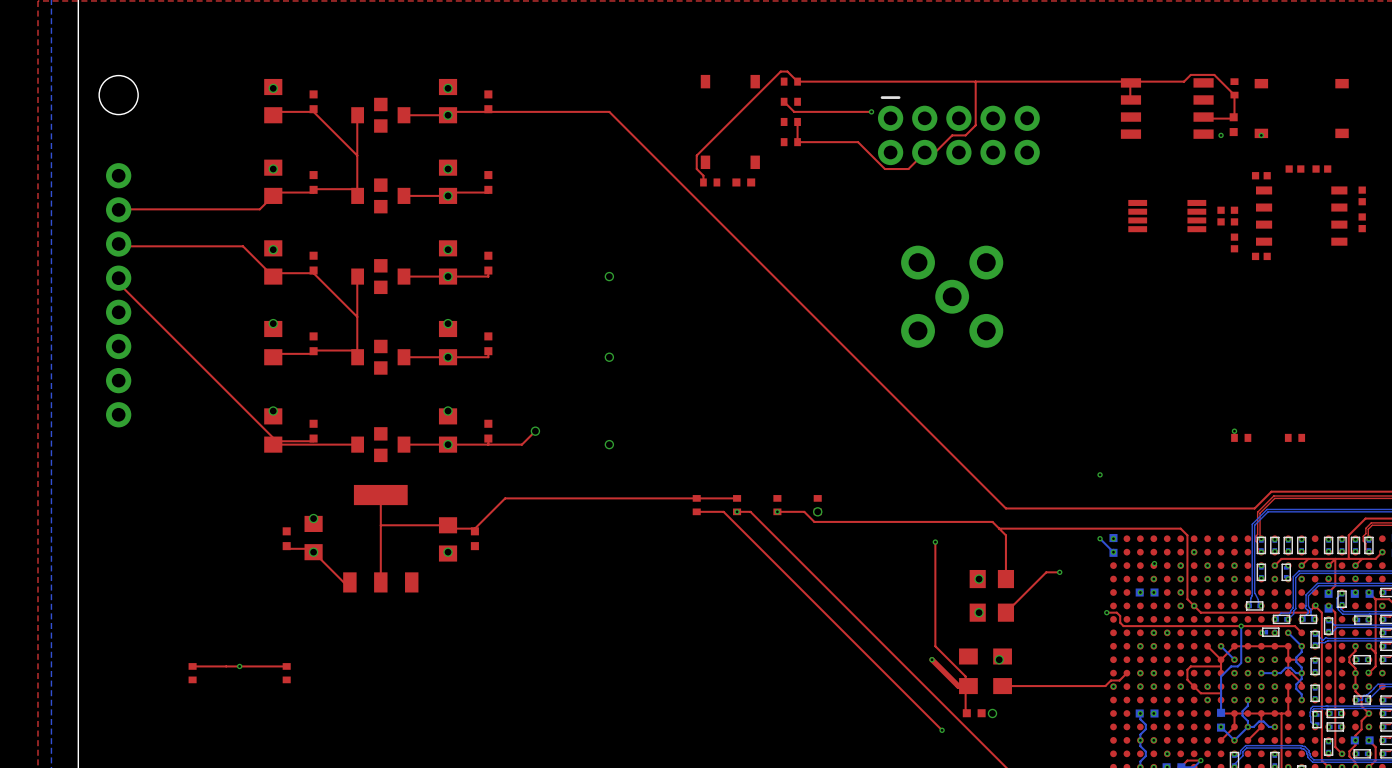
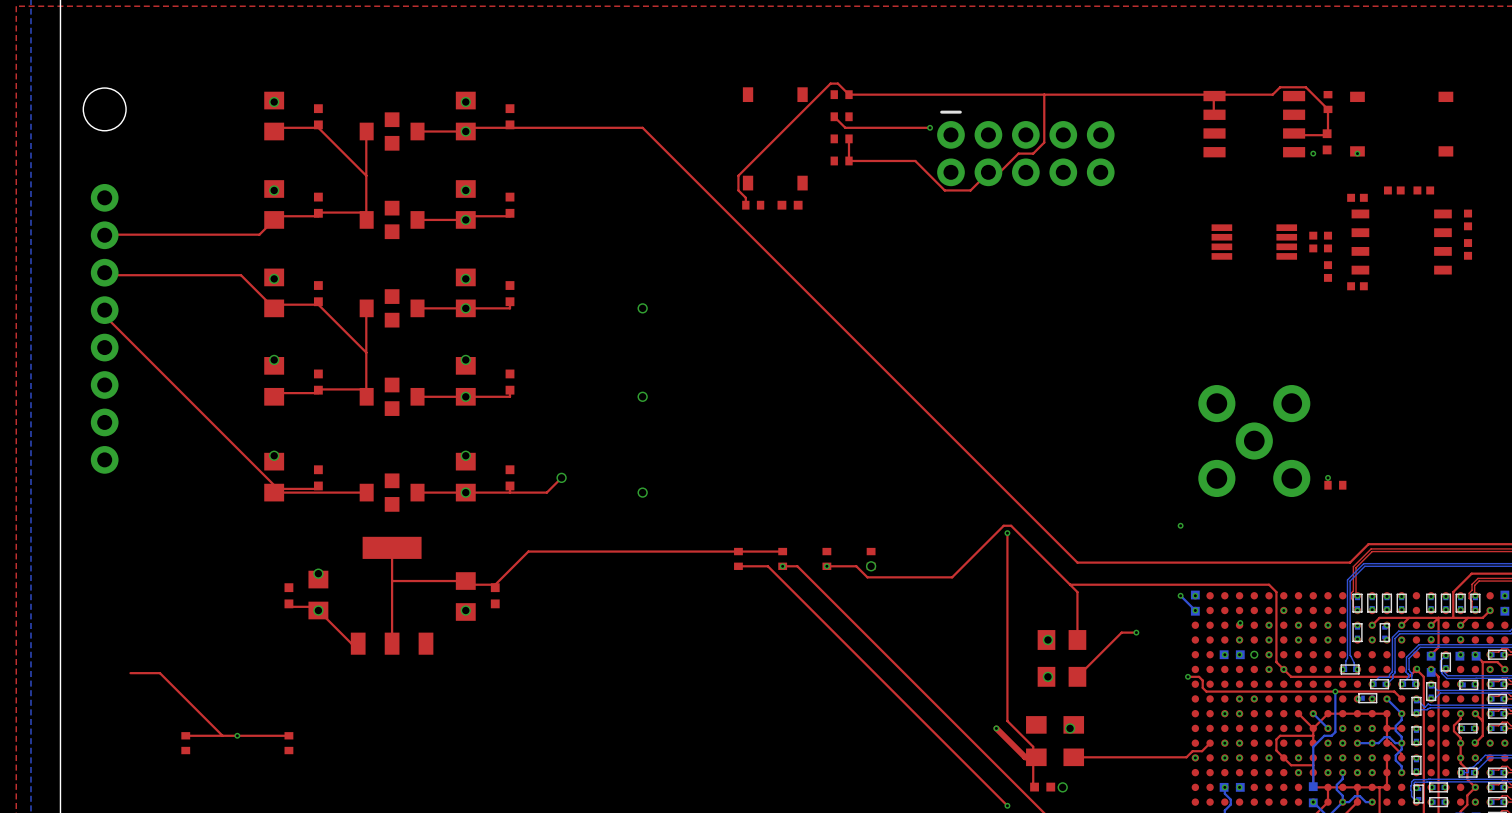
part position: (952, 296) -> (1254, 441)
part: (1294, 437) -> none
top track: (992, 521) (891, 521) -> (1062, 577) (1011, 525) (1003, 525) (952, 577)
top track: (935, 542) (935, 646) (942, 652) -> (1007, 533) (1007, 721)
via position: (935, 542) -> (1007, 533)
via: none -> (1254, 654)
top track: none -> (130, 673) (159, 673) (222, 735)

